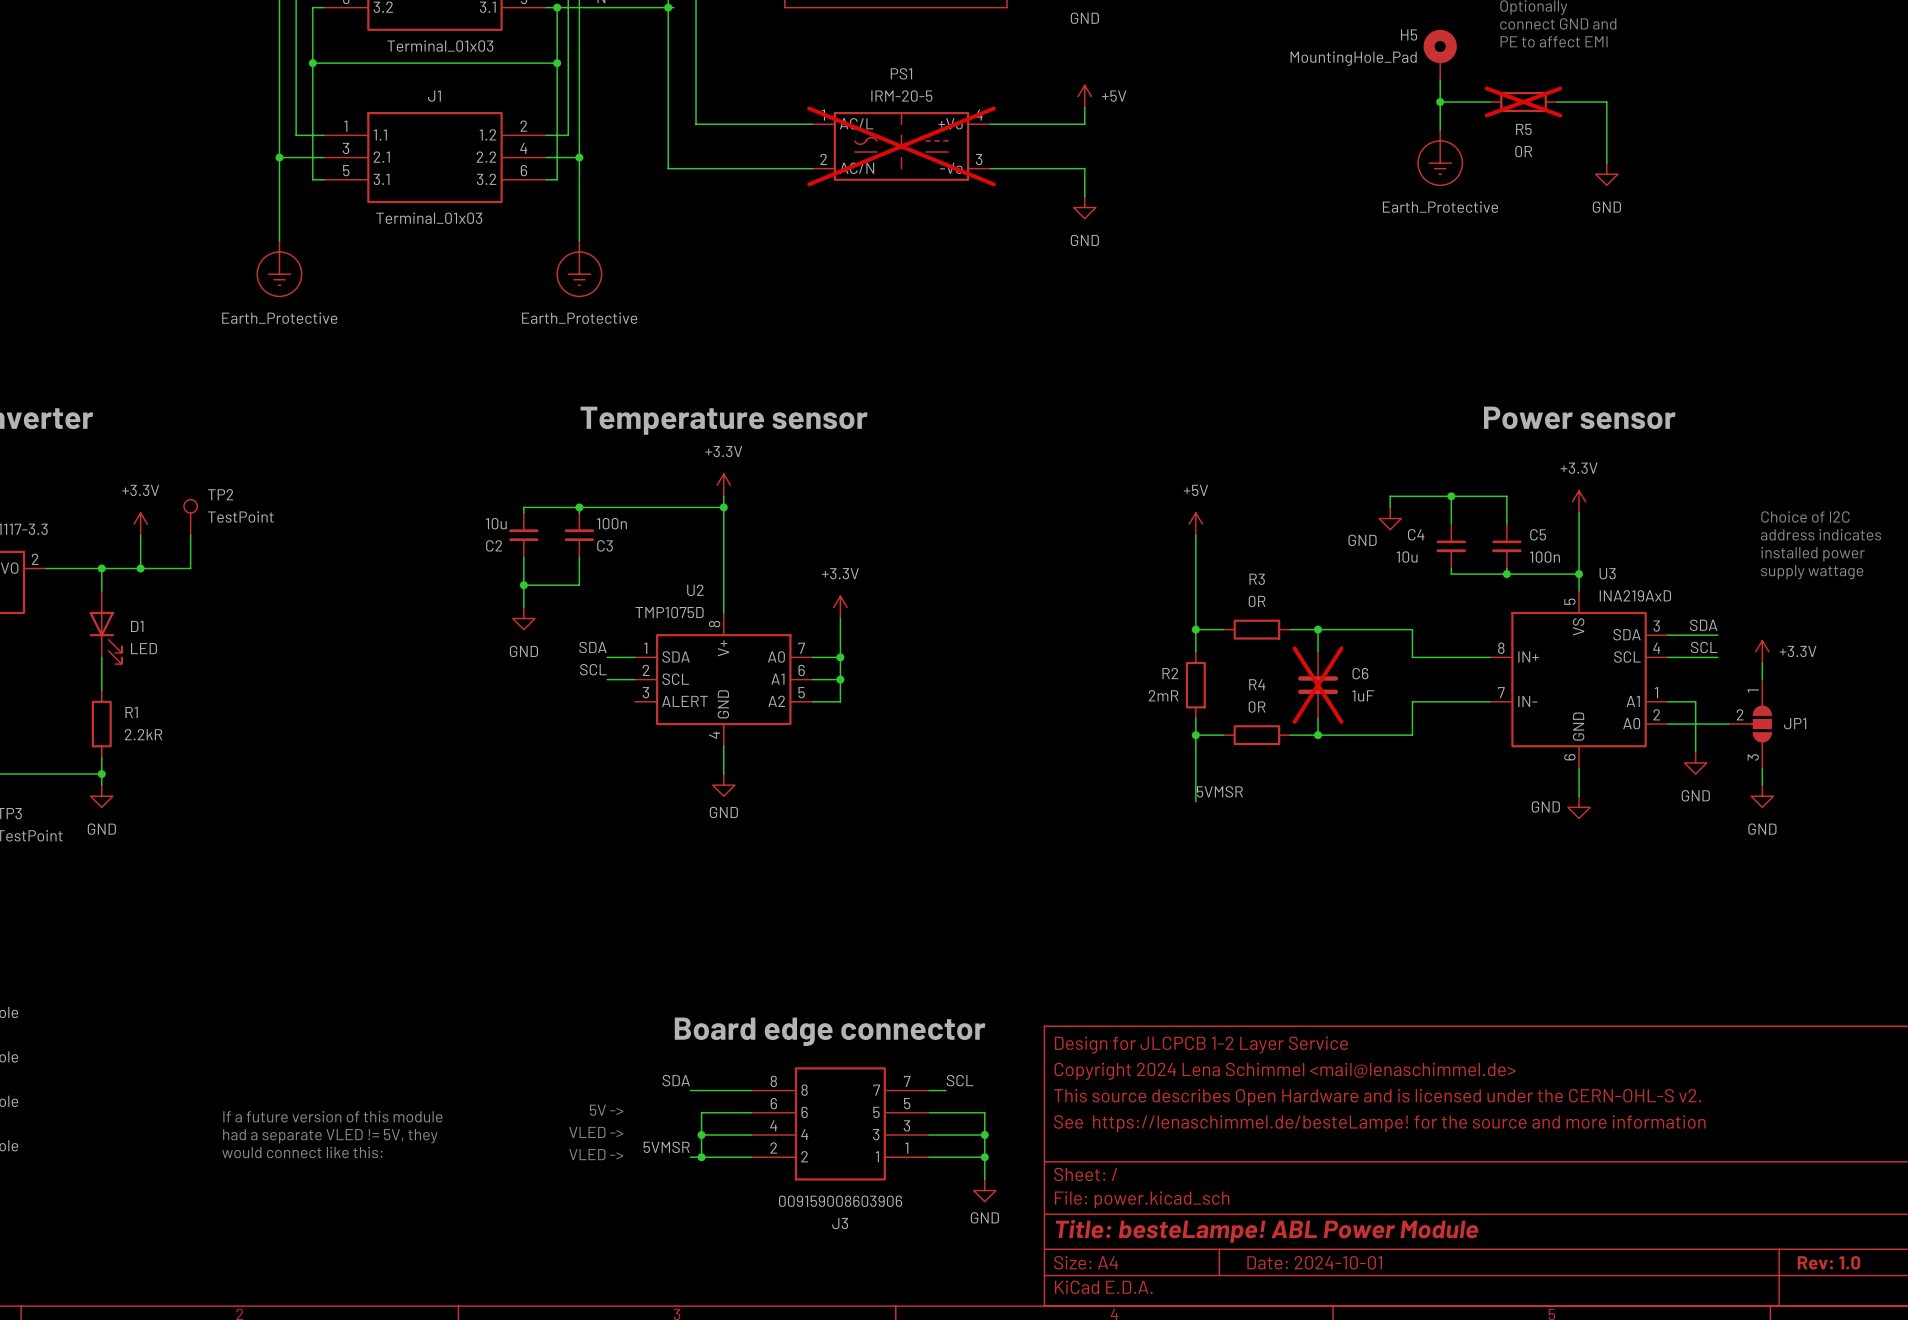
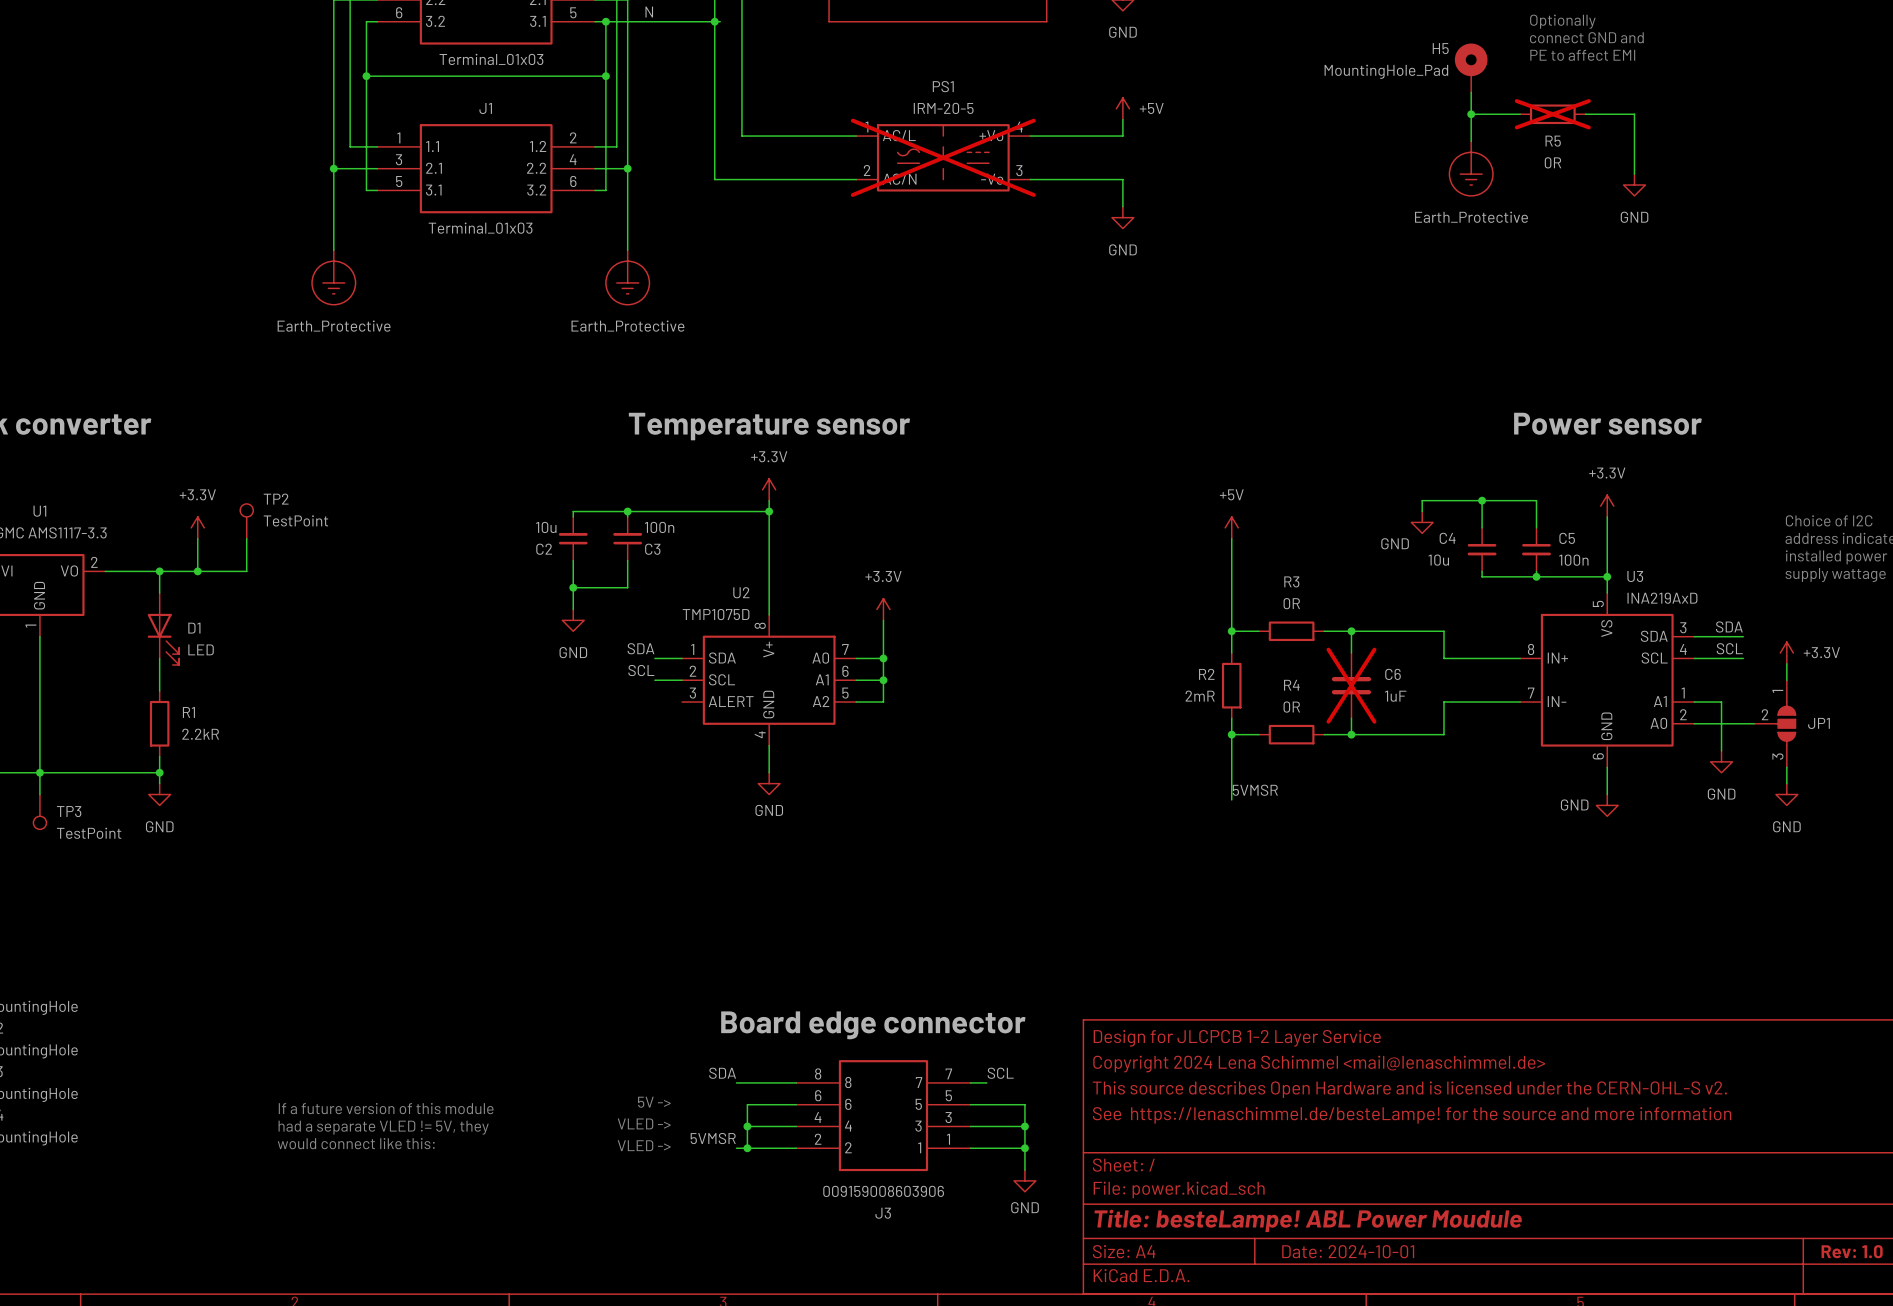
title block: Title: besteLampe! ABL Power Module (1266, 1231) -> Title: besteLampe! ABL Power Moudule (1308, 1220)

